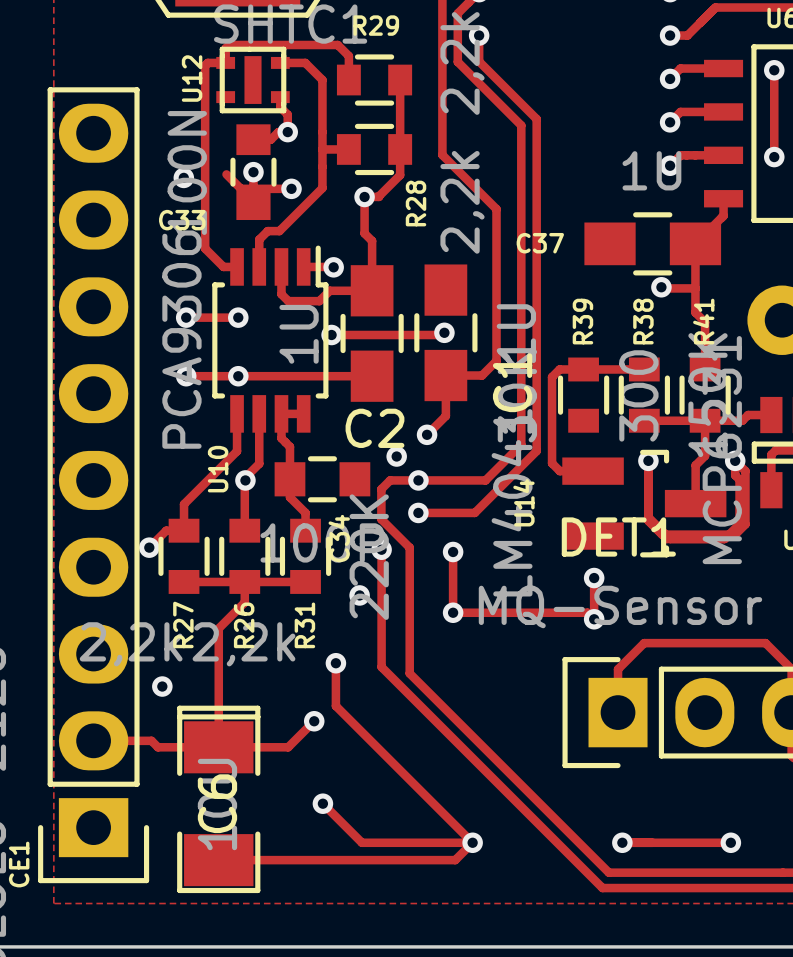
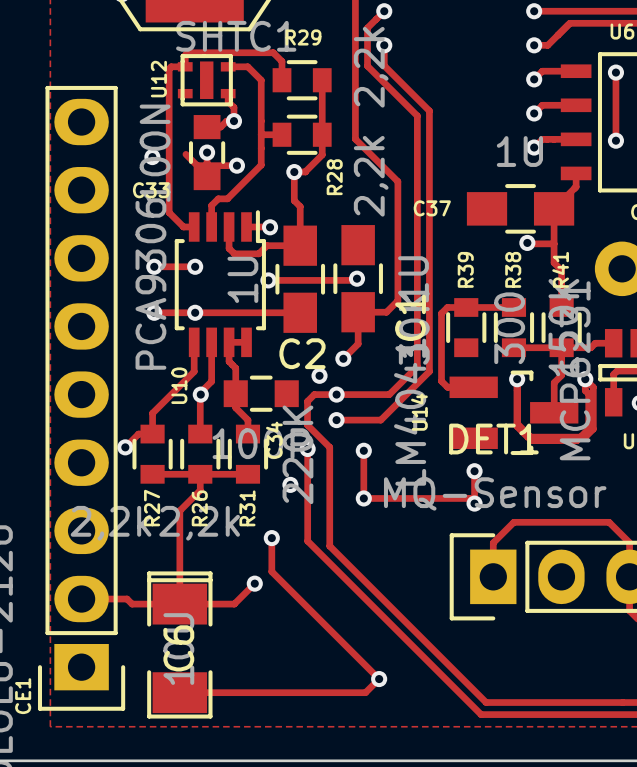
via: (162, 686) -> none
track: (322, 803) (361, 842) (472, 842) -> none
via: (322, 803) -> none
track: (622, 842) (730, 842) -> none
via: (622, 842) -> none
via: (730, 842) -> none

